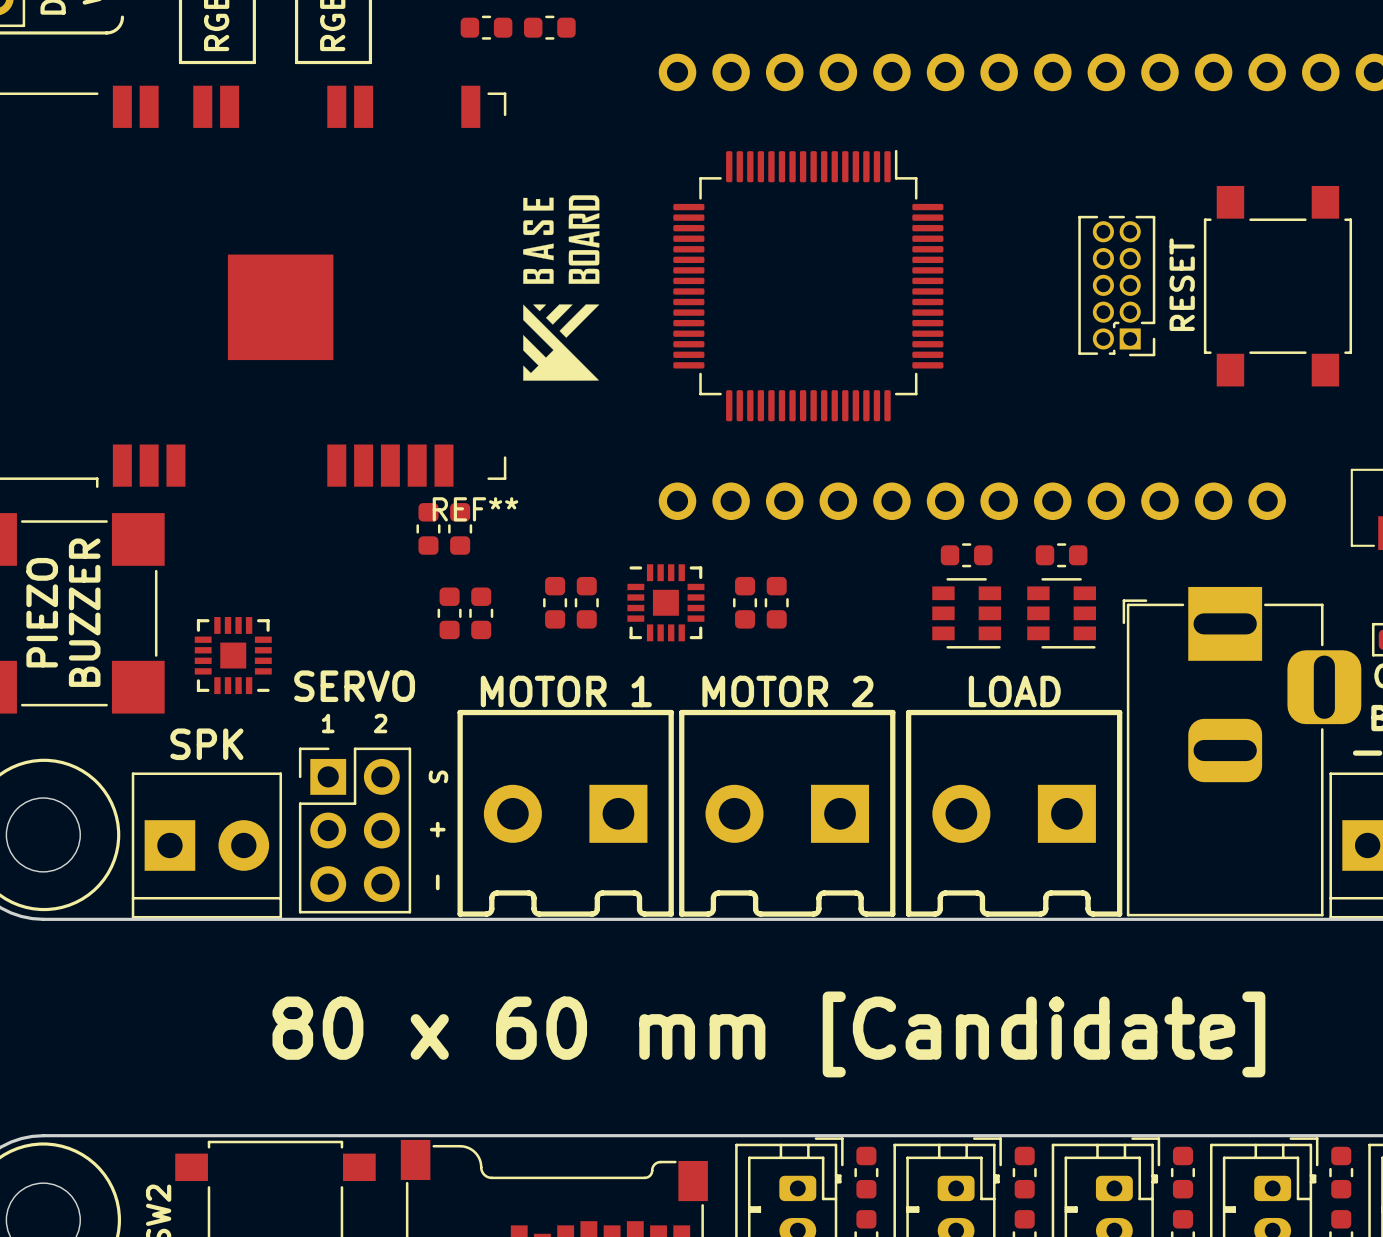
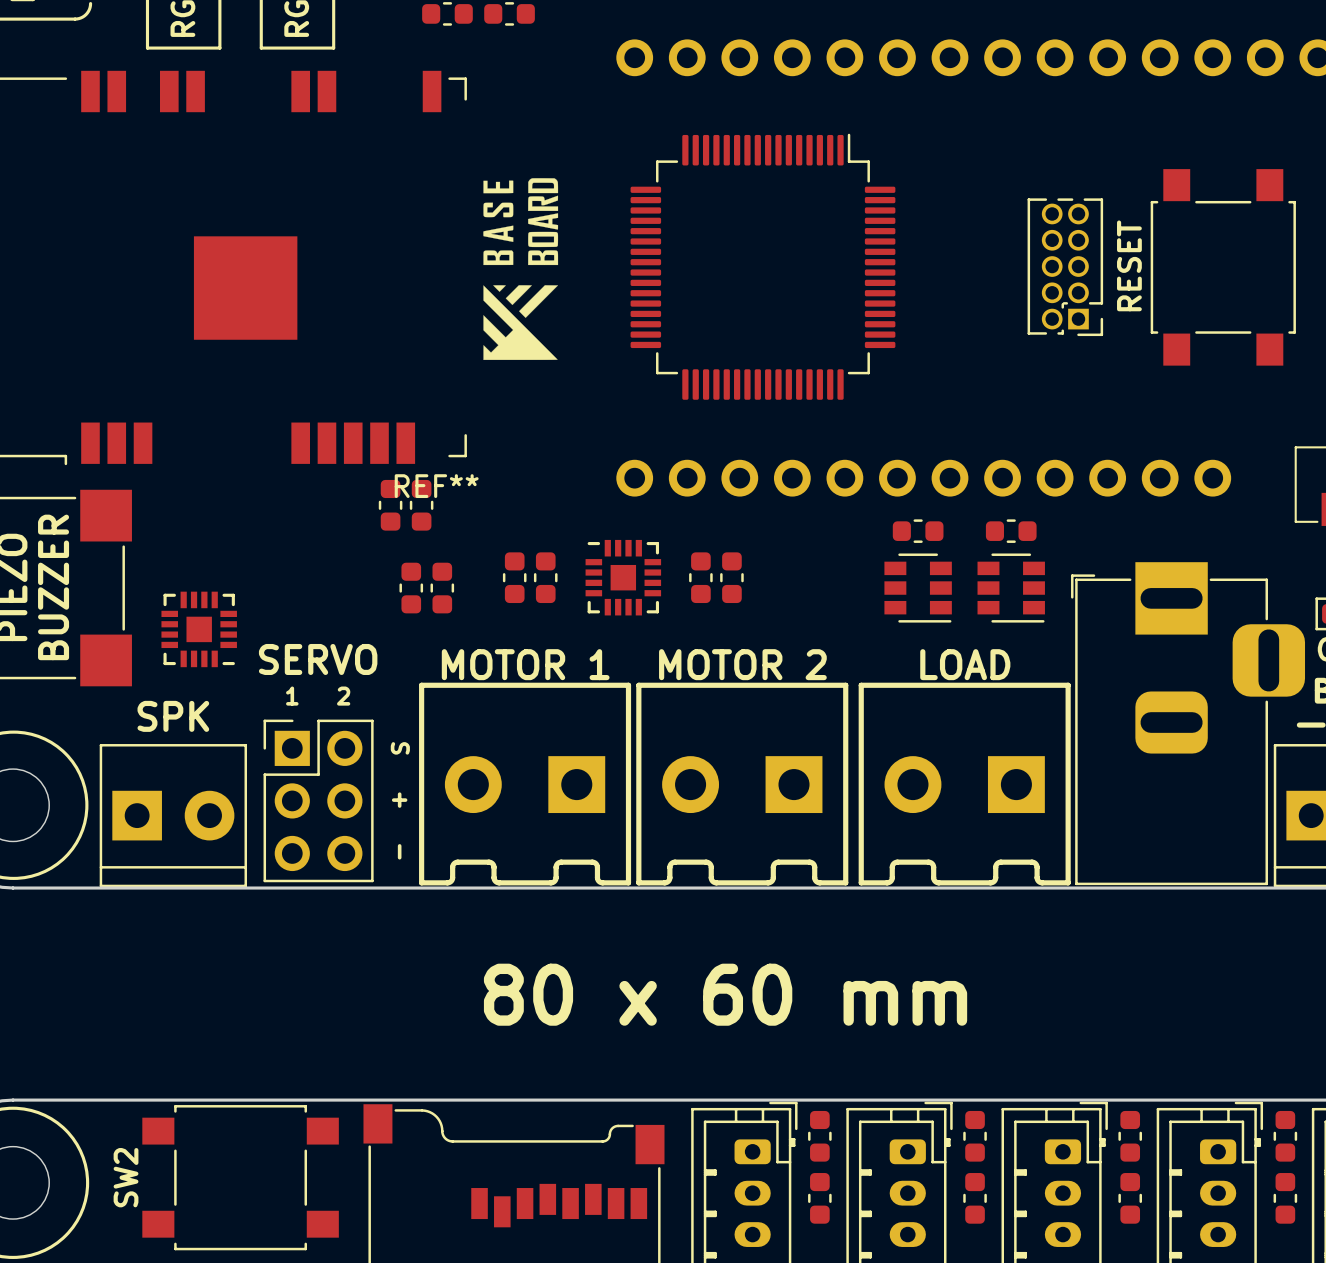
text: 80 x 60 mm [Candidate] (768, 1034) -> 80 x 60 mm (725, 994)

